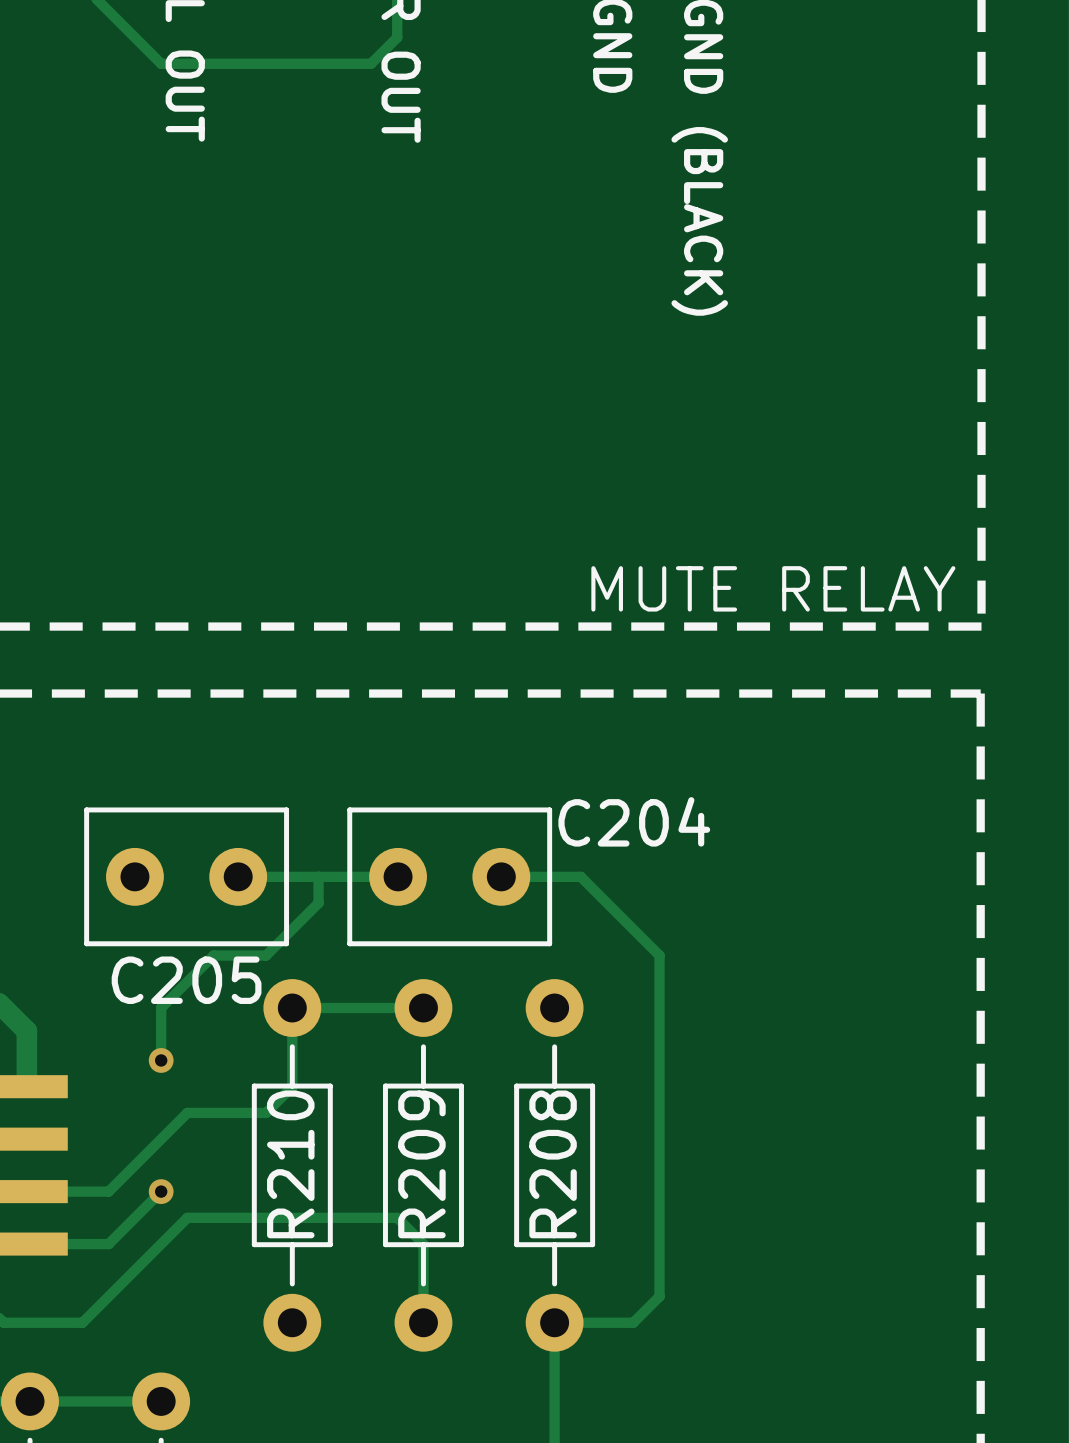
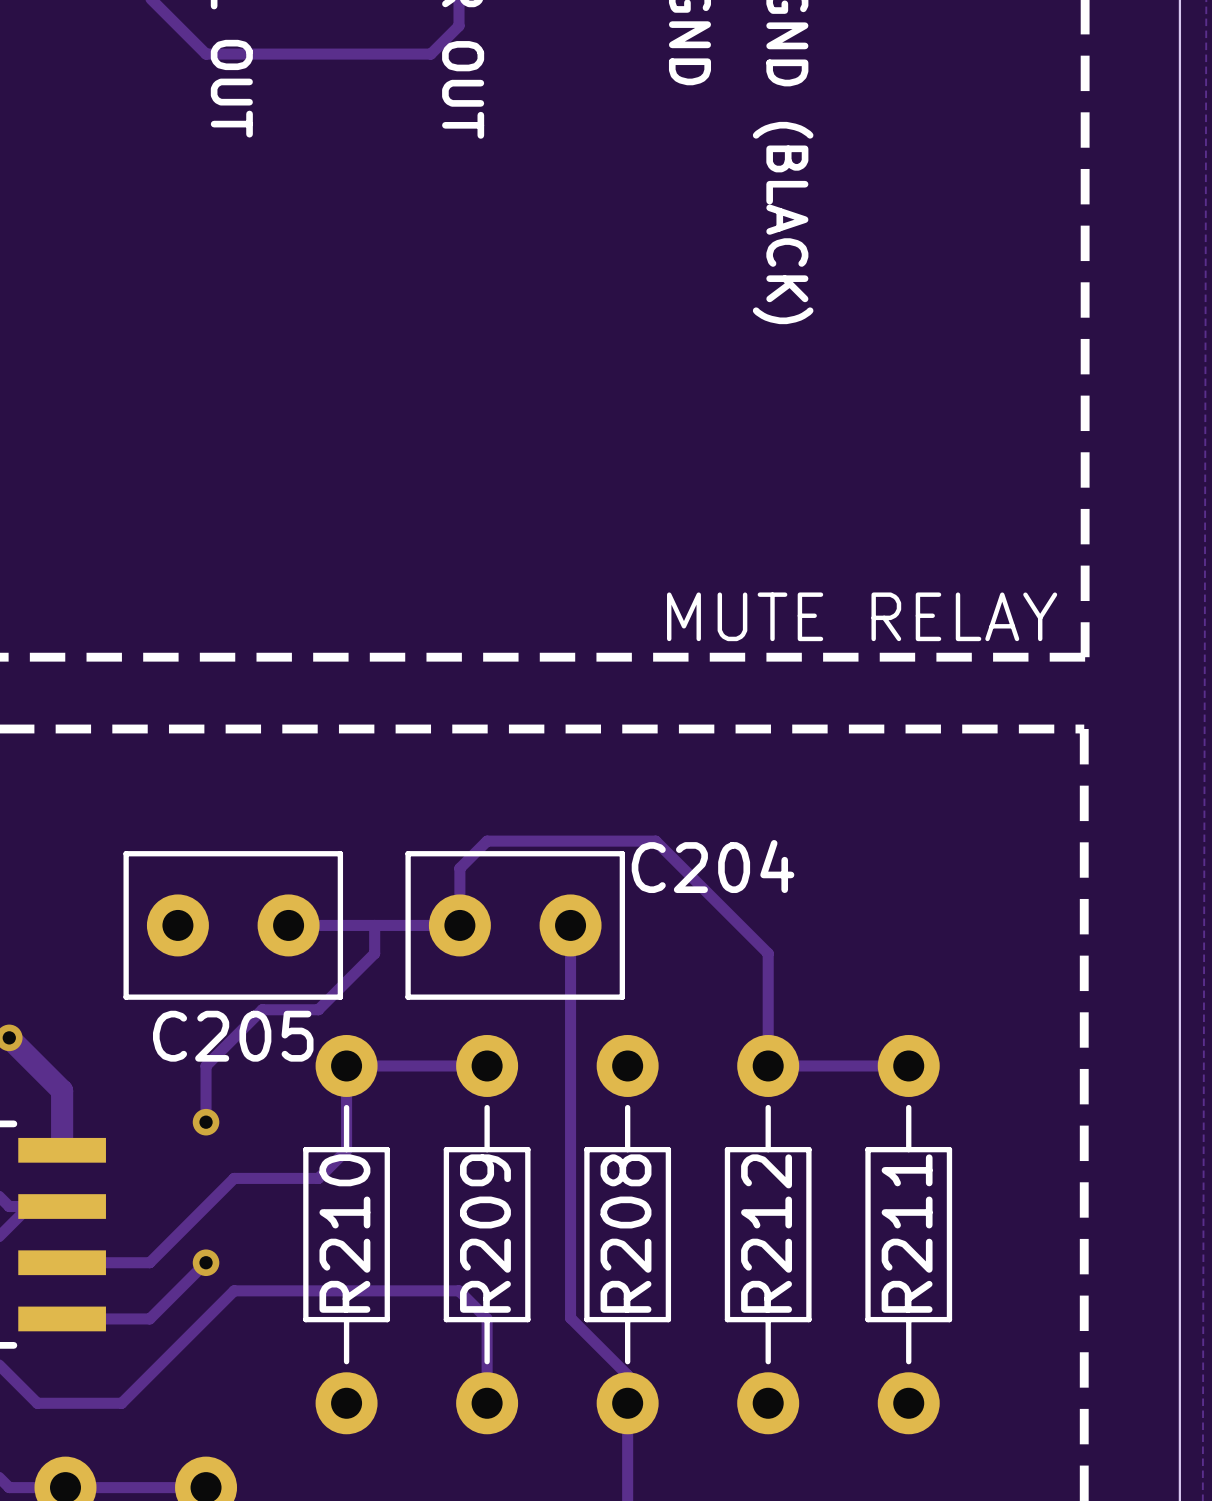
track: none -> (459, 925) (459, 868) (487, 841) (655, 841) (768, 953) (768, 1065) (908, 1065)
track: (501, 876) (580, 876) (659, 955) (659, 1296) (633, 1322) (554, 1322) -> (570, 925) (570, 1318) (627, 1375) (627, 1403)
R212: none -> (768, 1234)
R211: none -> (908, 1234)

